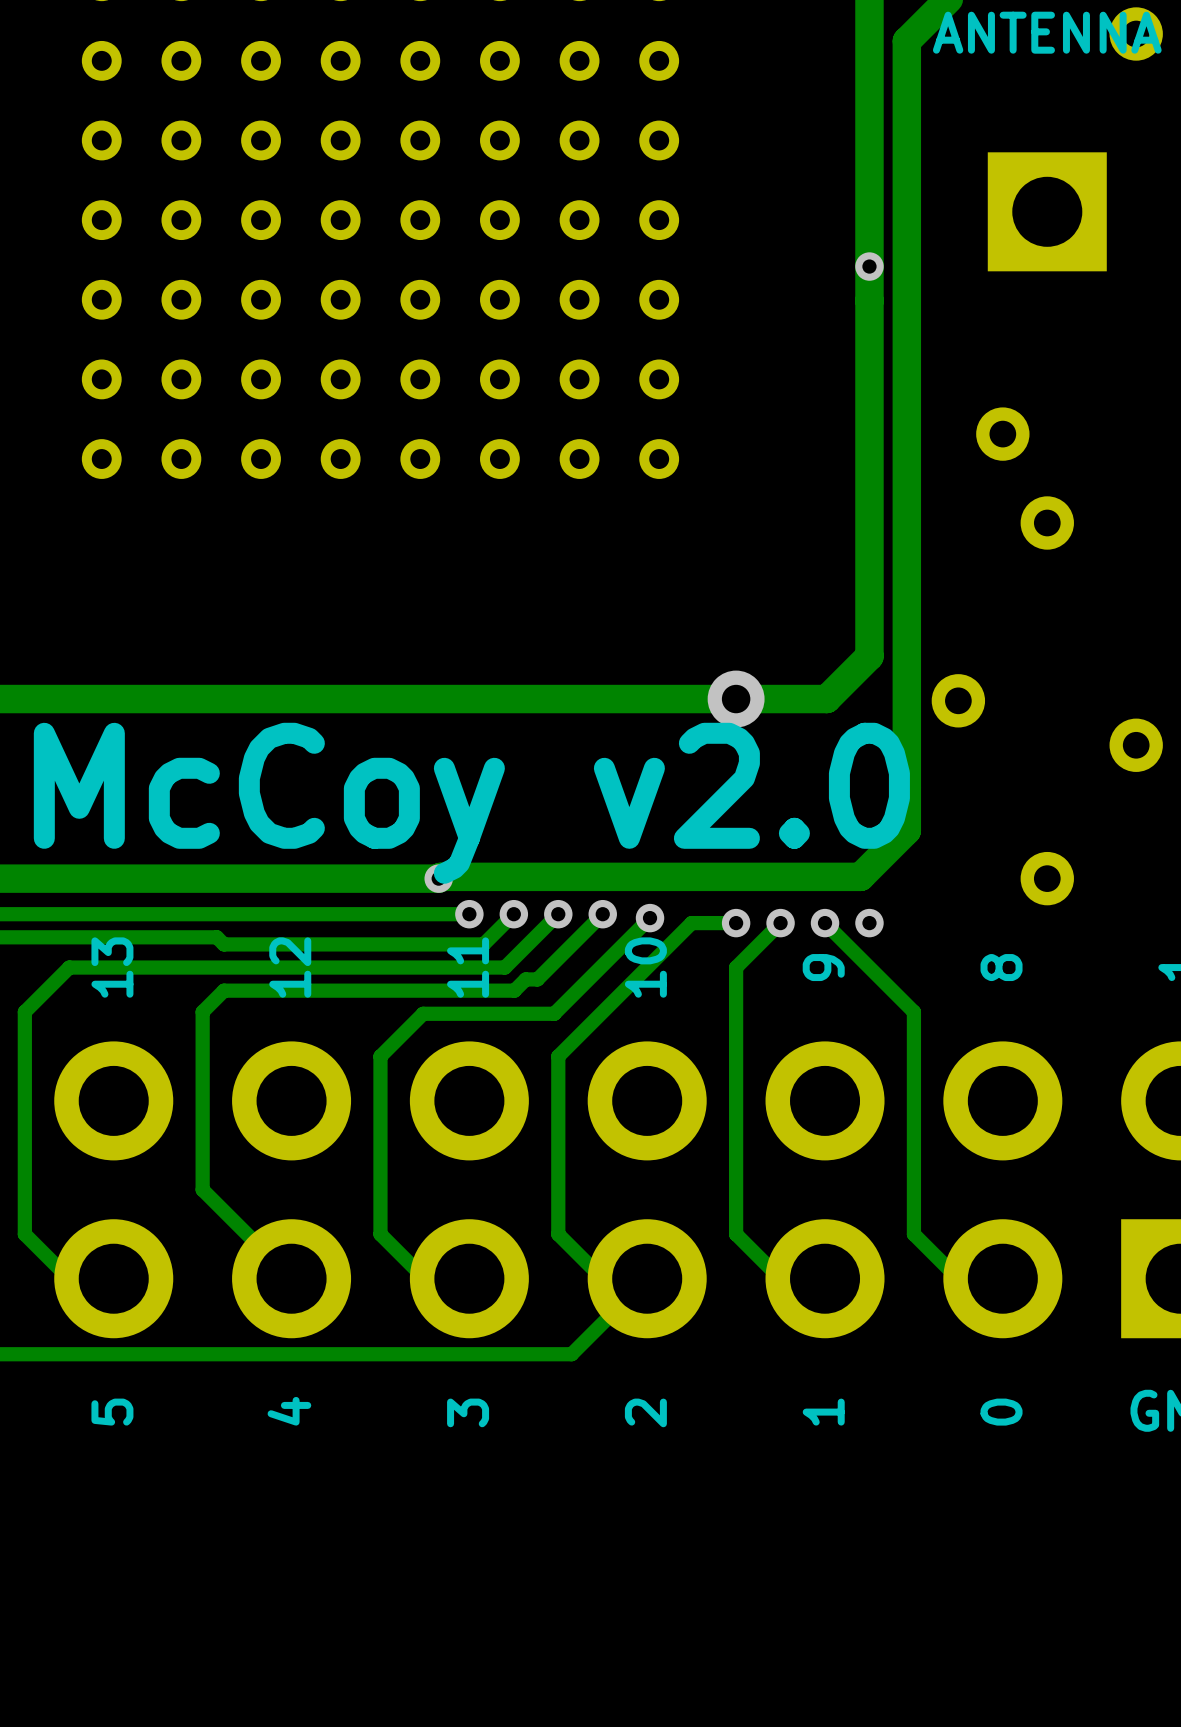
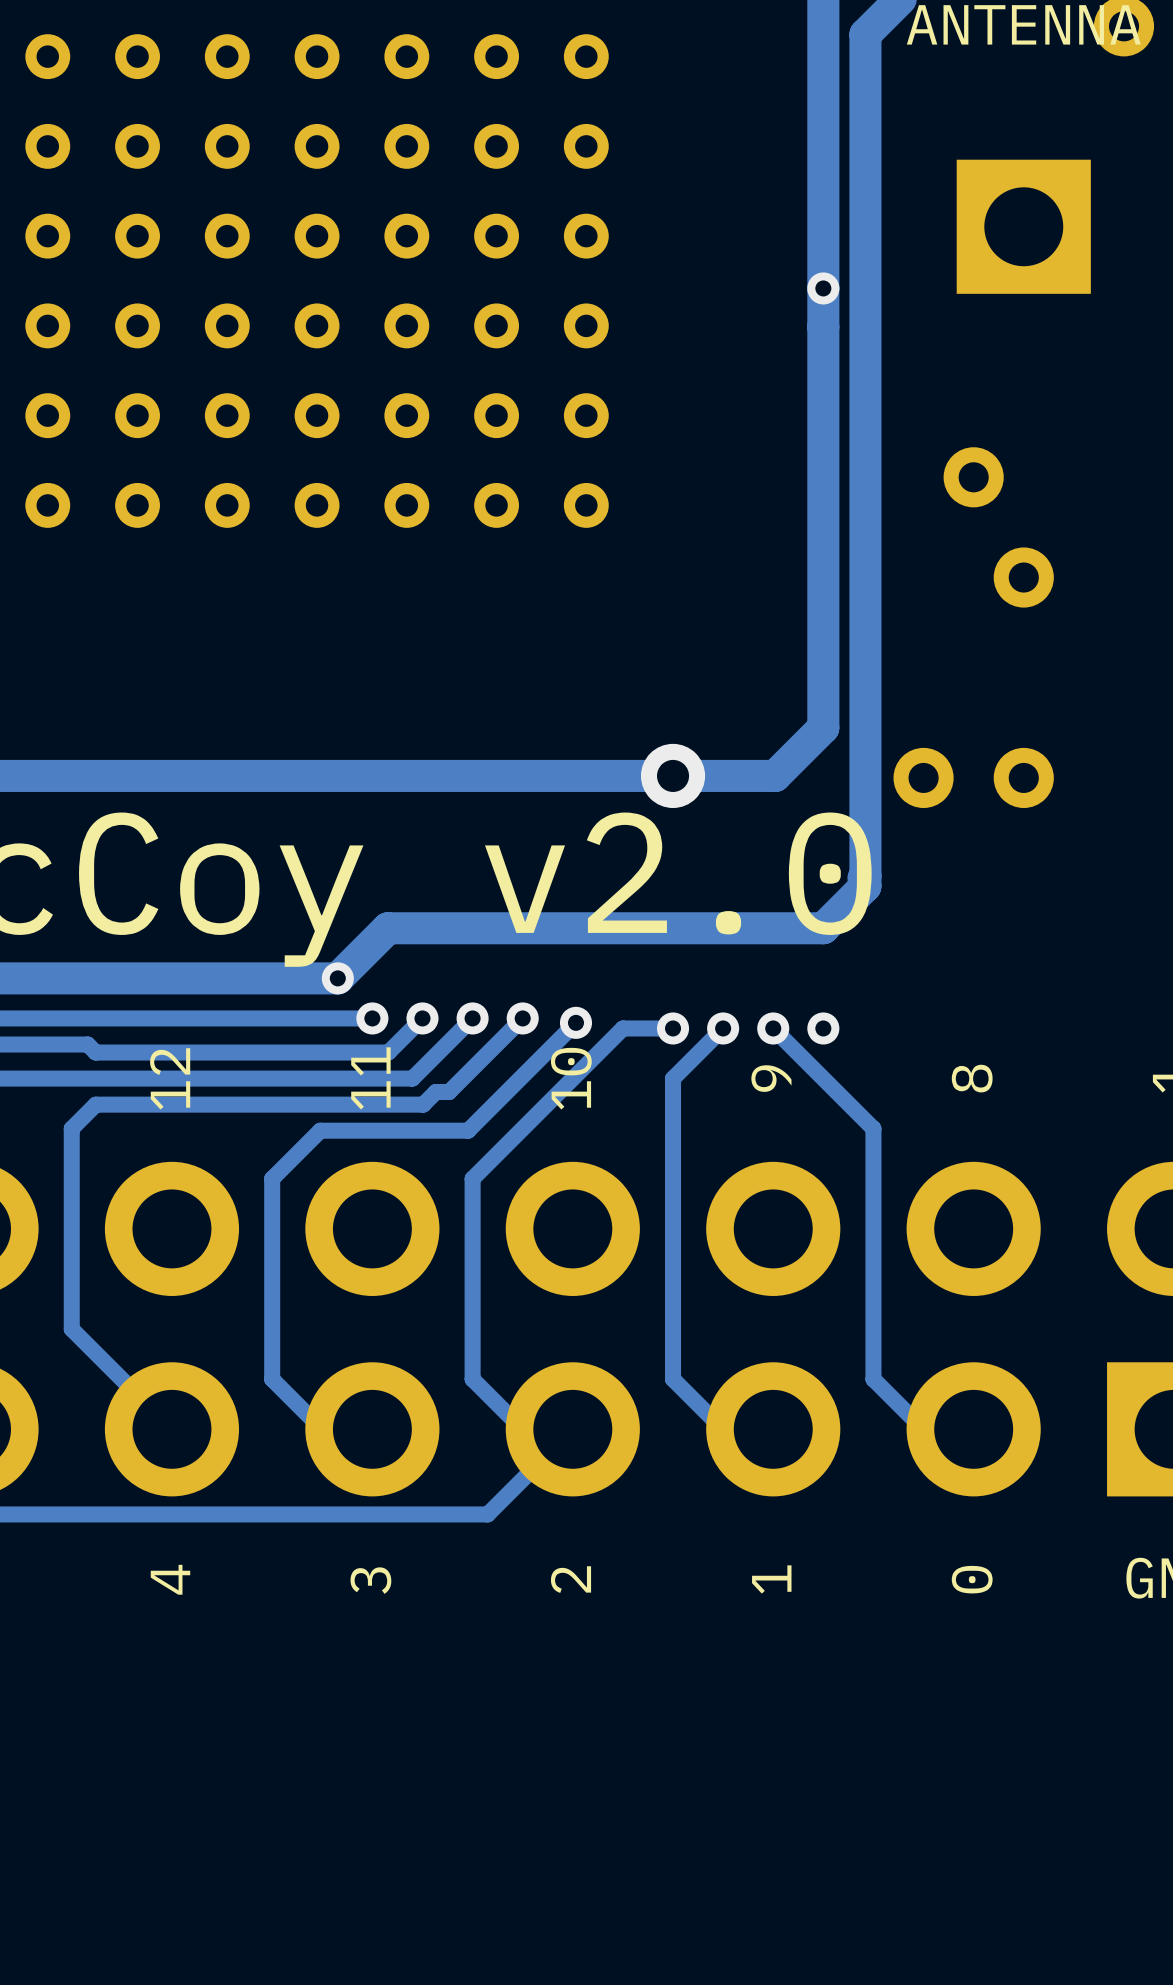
part: none -> (1023, 777)
part: (1136, 745) -> none
track: (906, 796) (906, 830) (860, 876) (440, 876) -> (865, 886) (823, 928) (387, 928) (339, 976)
part: (1047, 878) -> none

